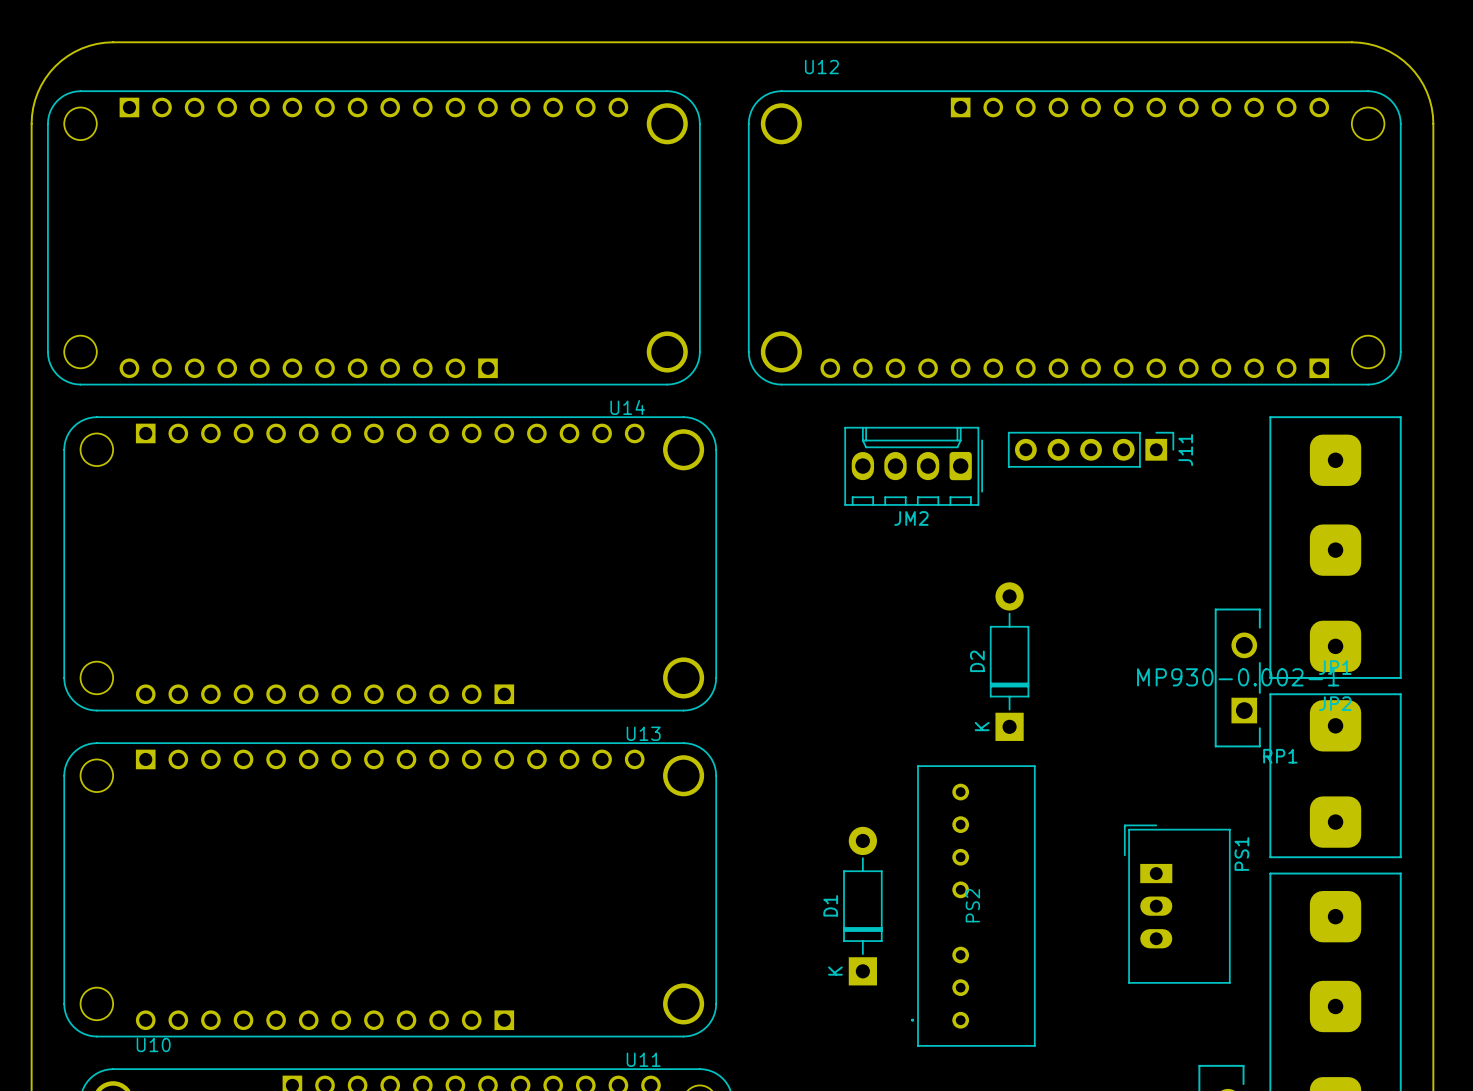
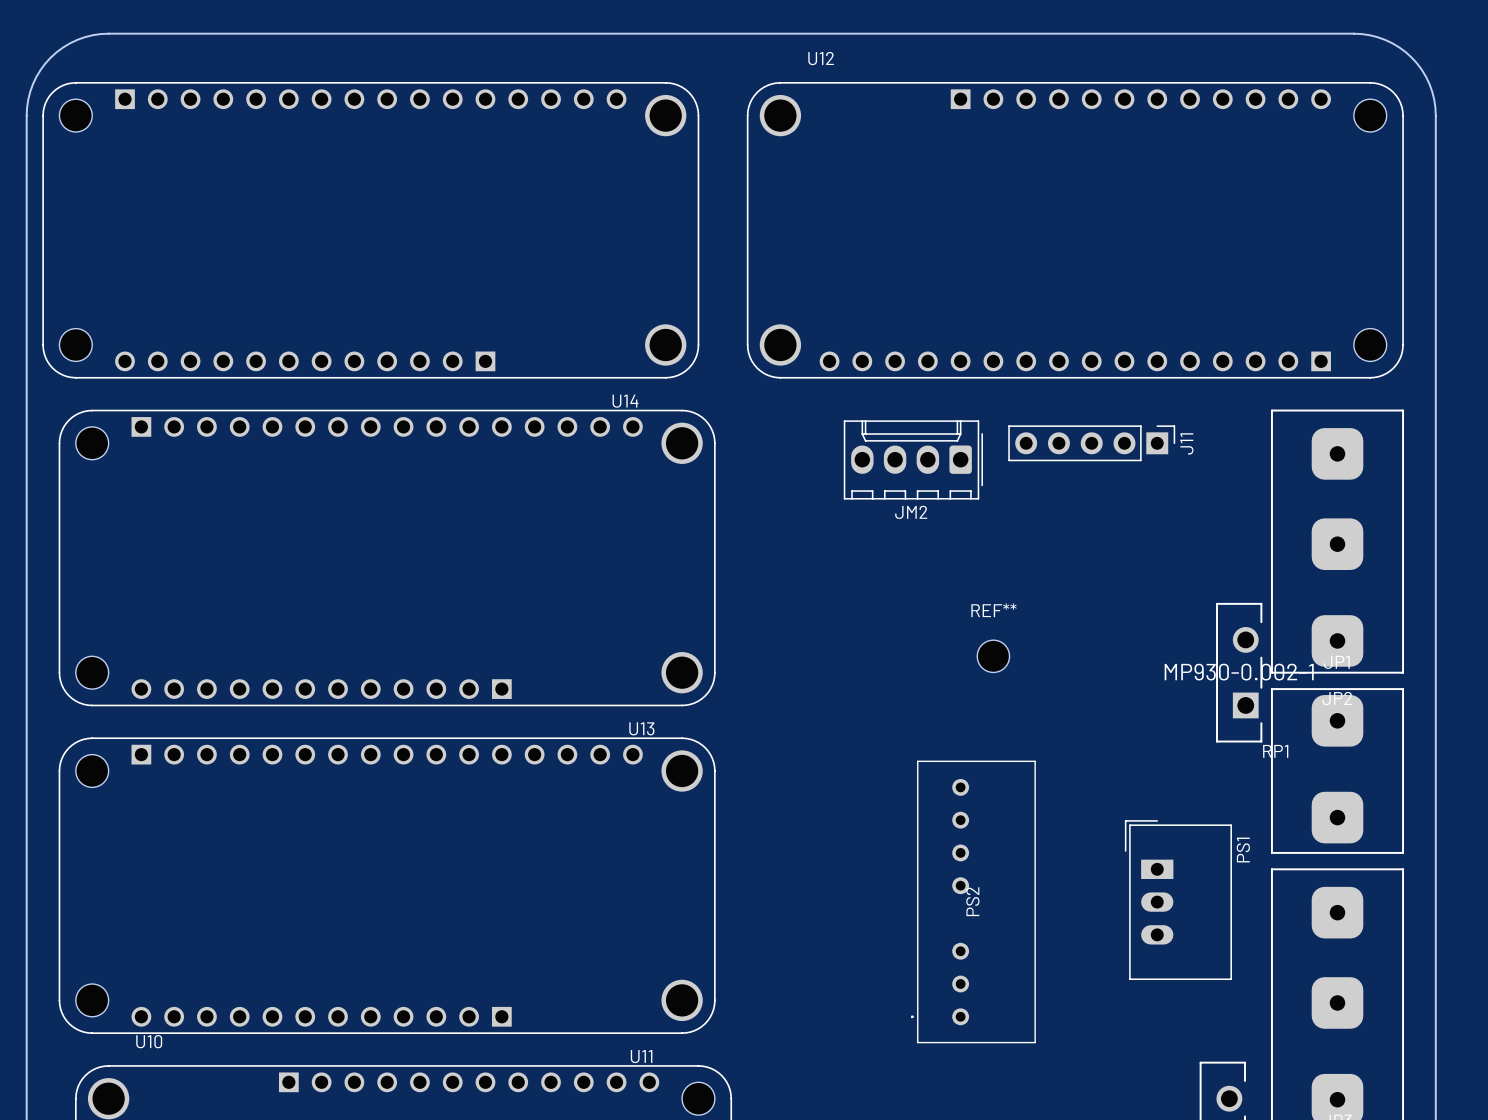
REF**: none -> (993, 656)
D2: (1009, 661) -> none
D1: (862, 906) -> none

